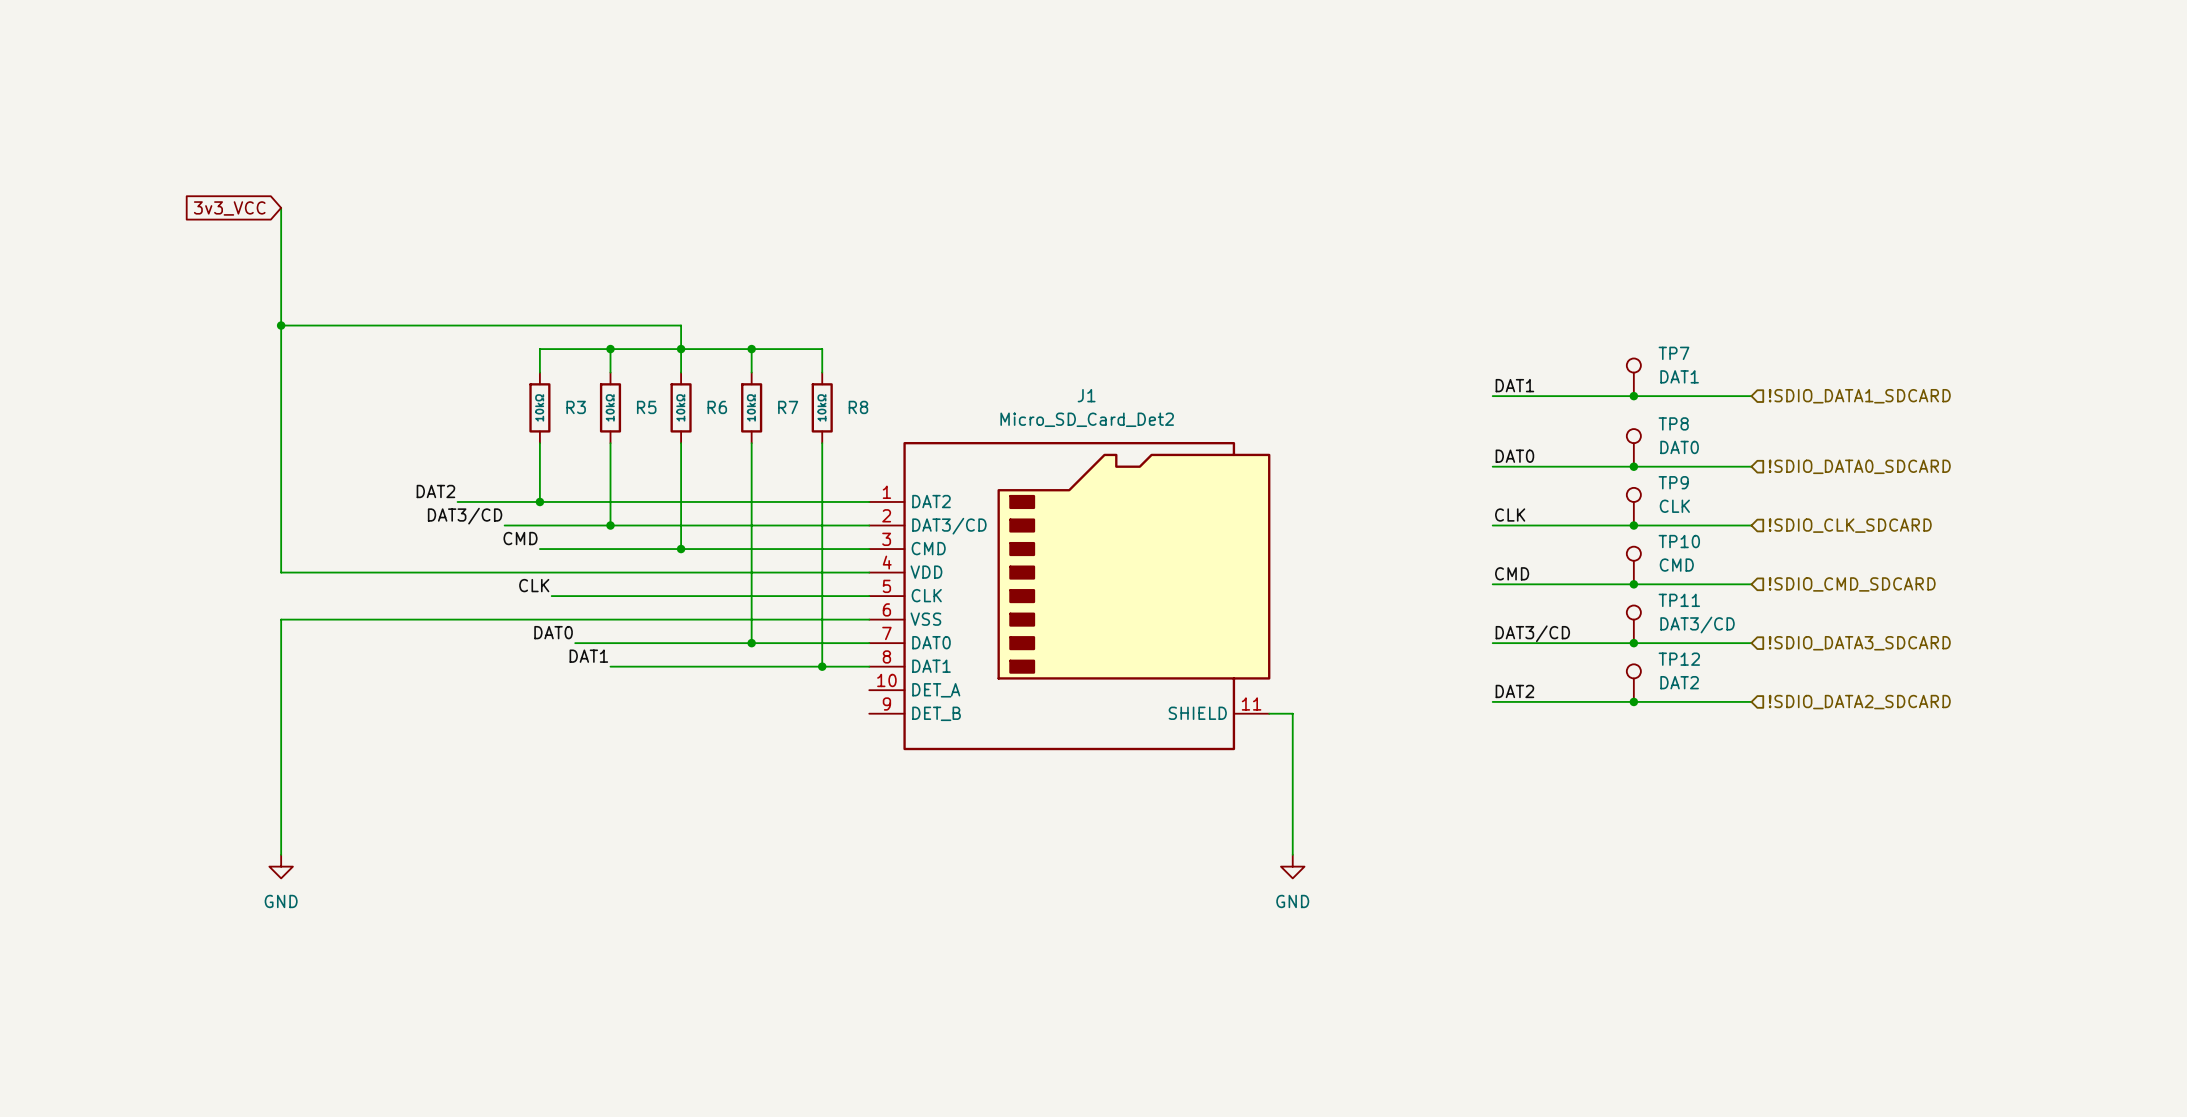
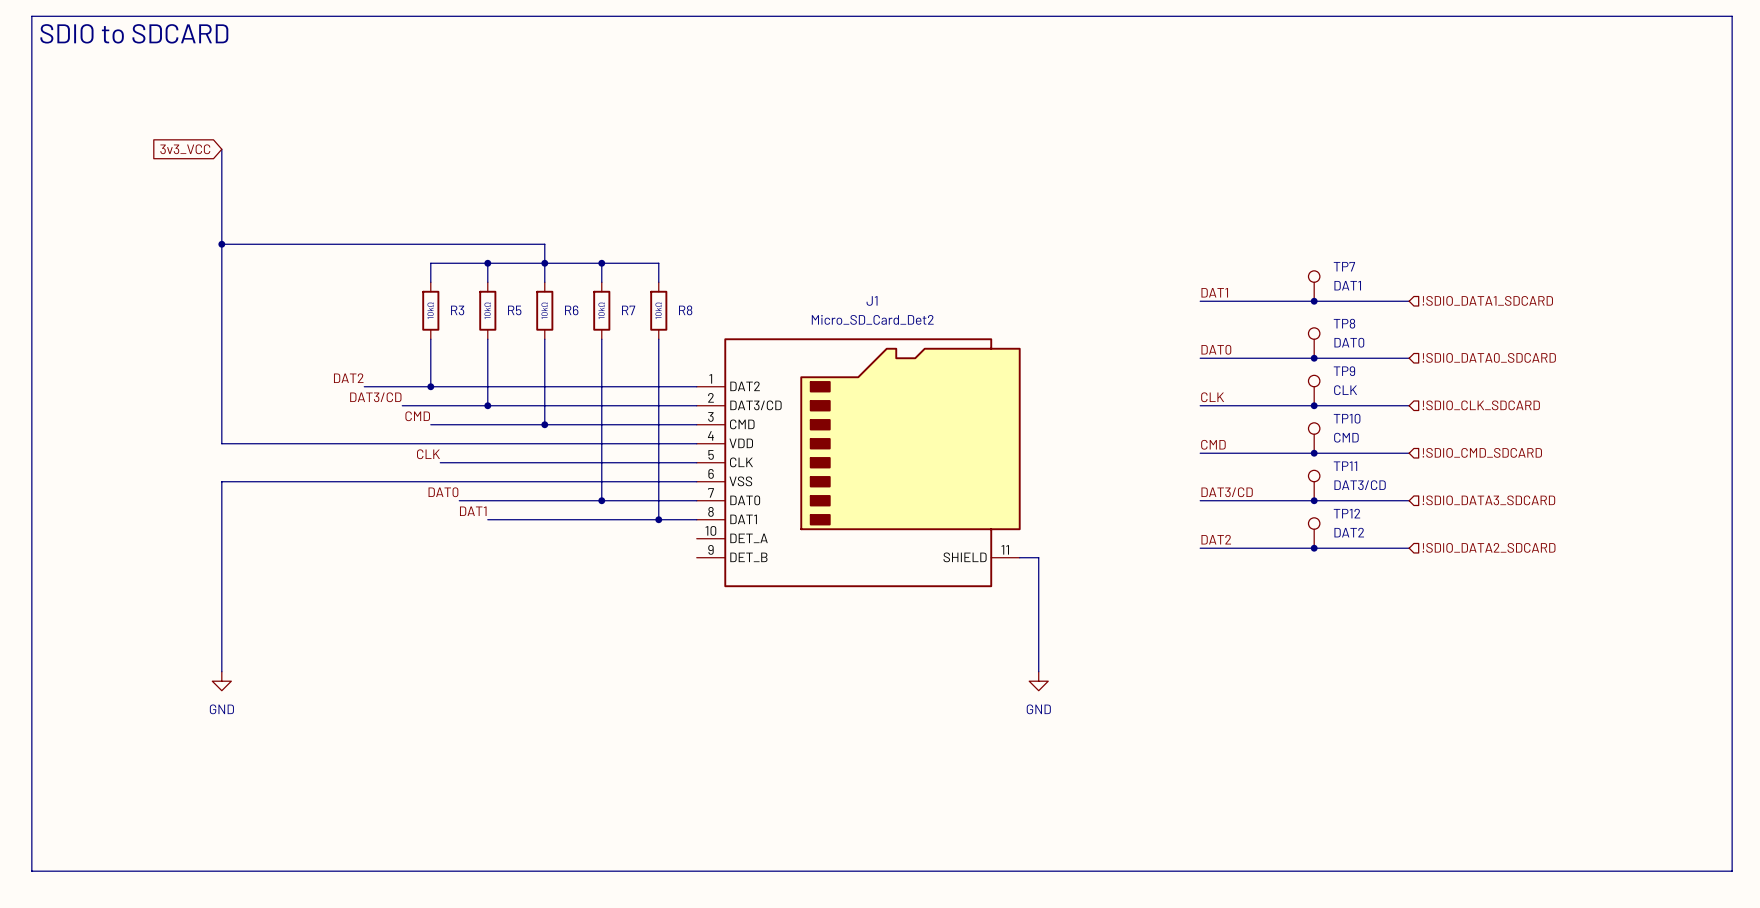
line: none -> (31, 16) (1732, 16) (1732, 871) (31, 871) (31, 16)
text: none -> SDIO to SDCARD (134, 33)

